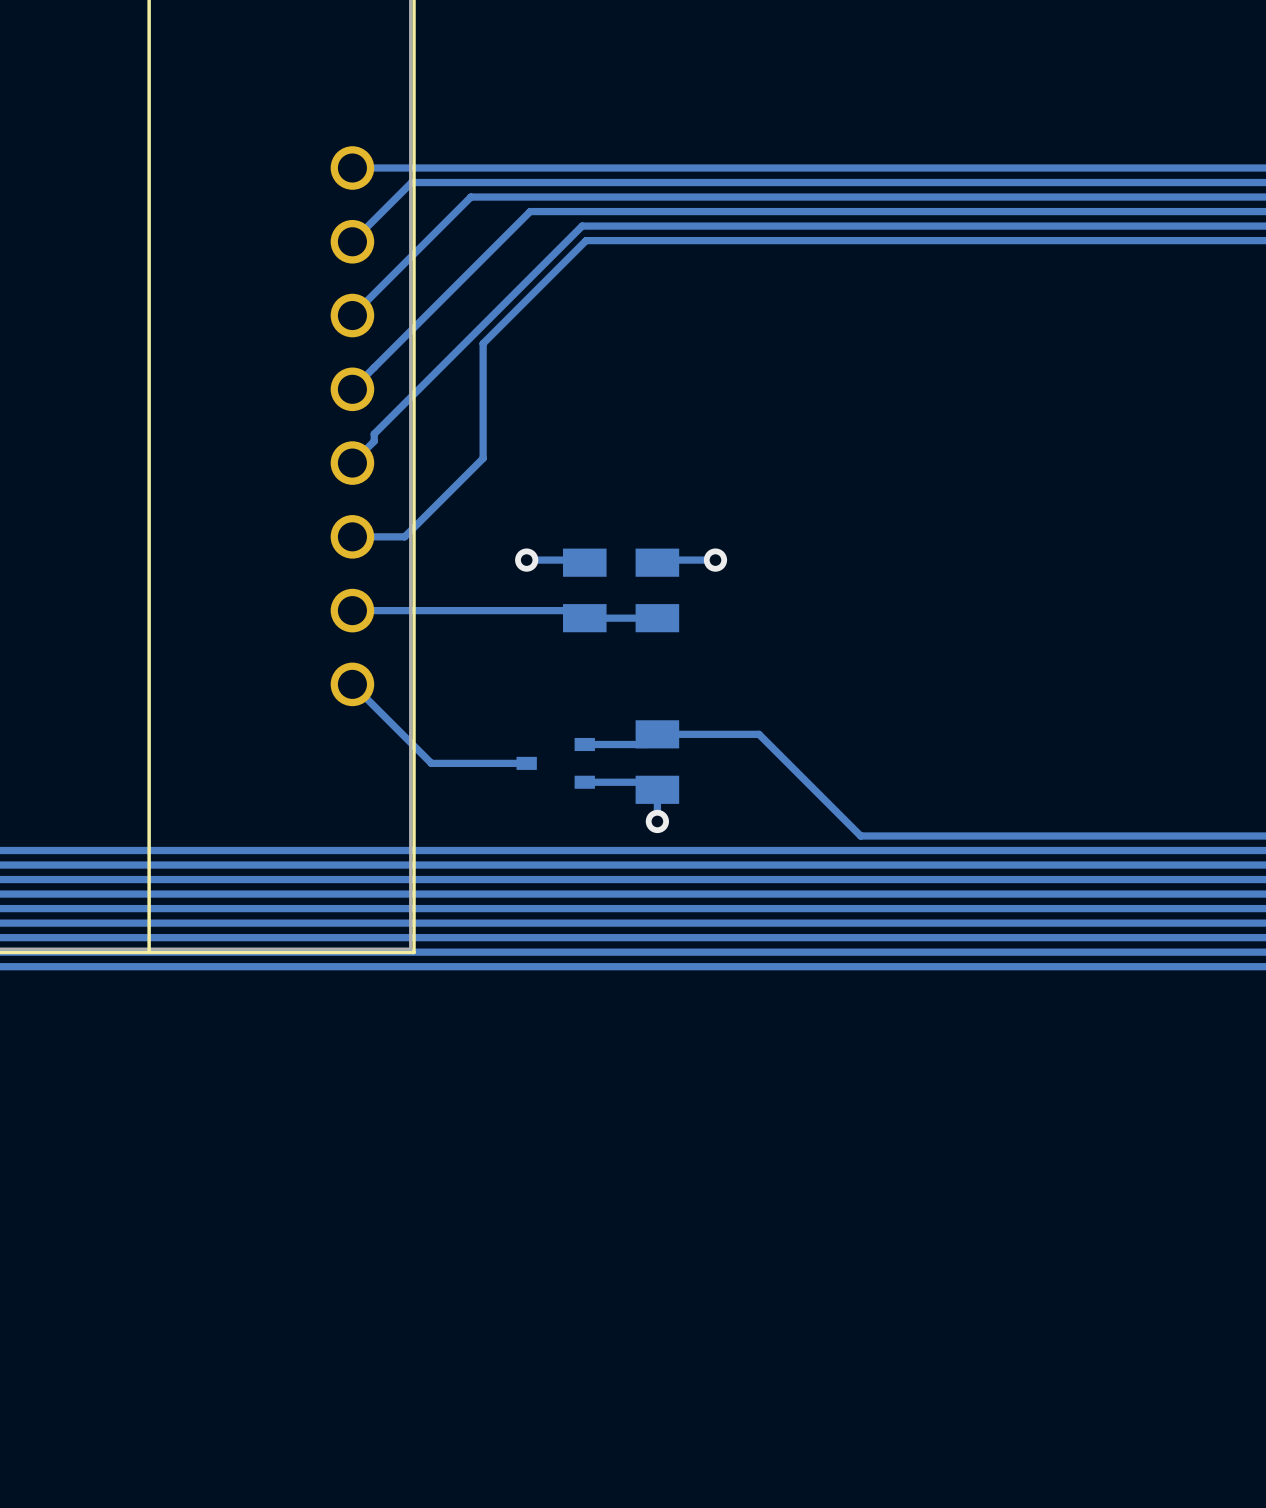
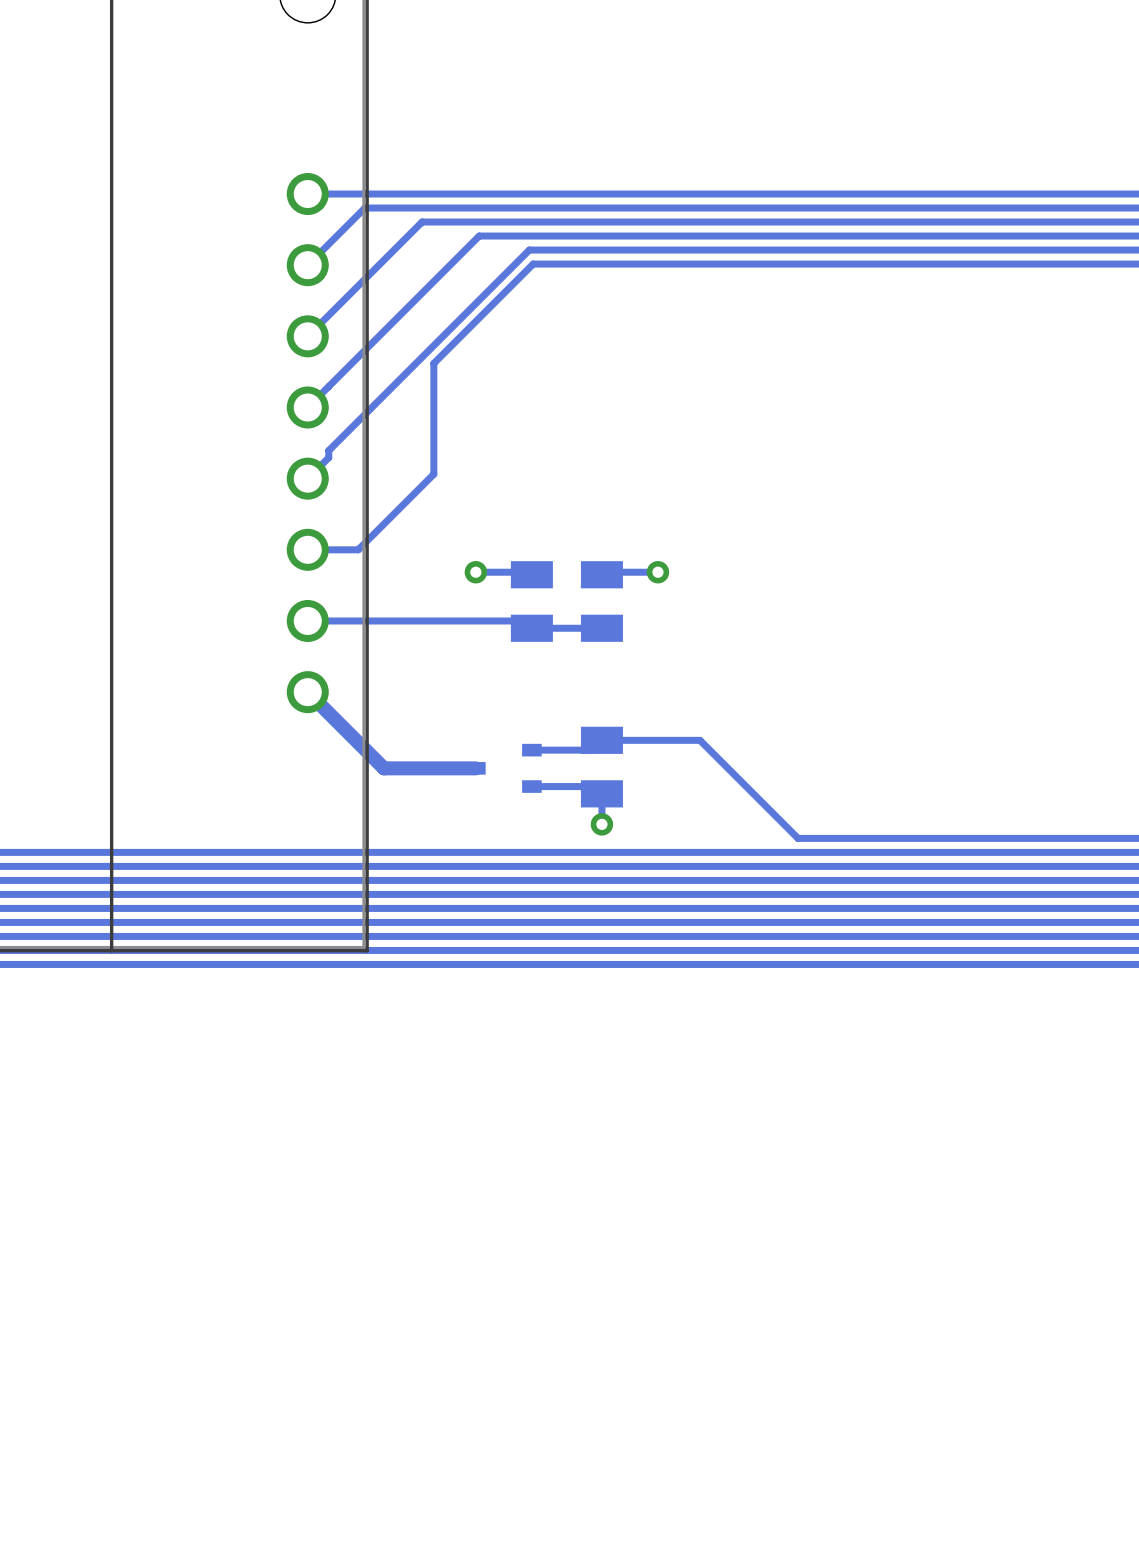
bottom track width: thin (352, 684) (431, 763) (526, 763) -> thick (307, 692) (383, 768) (475, 768)

